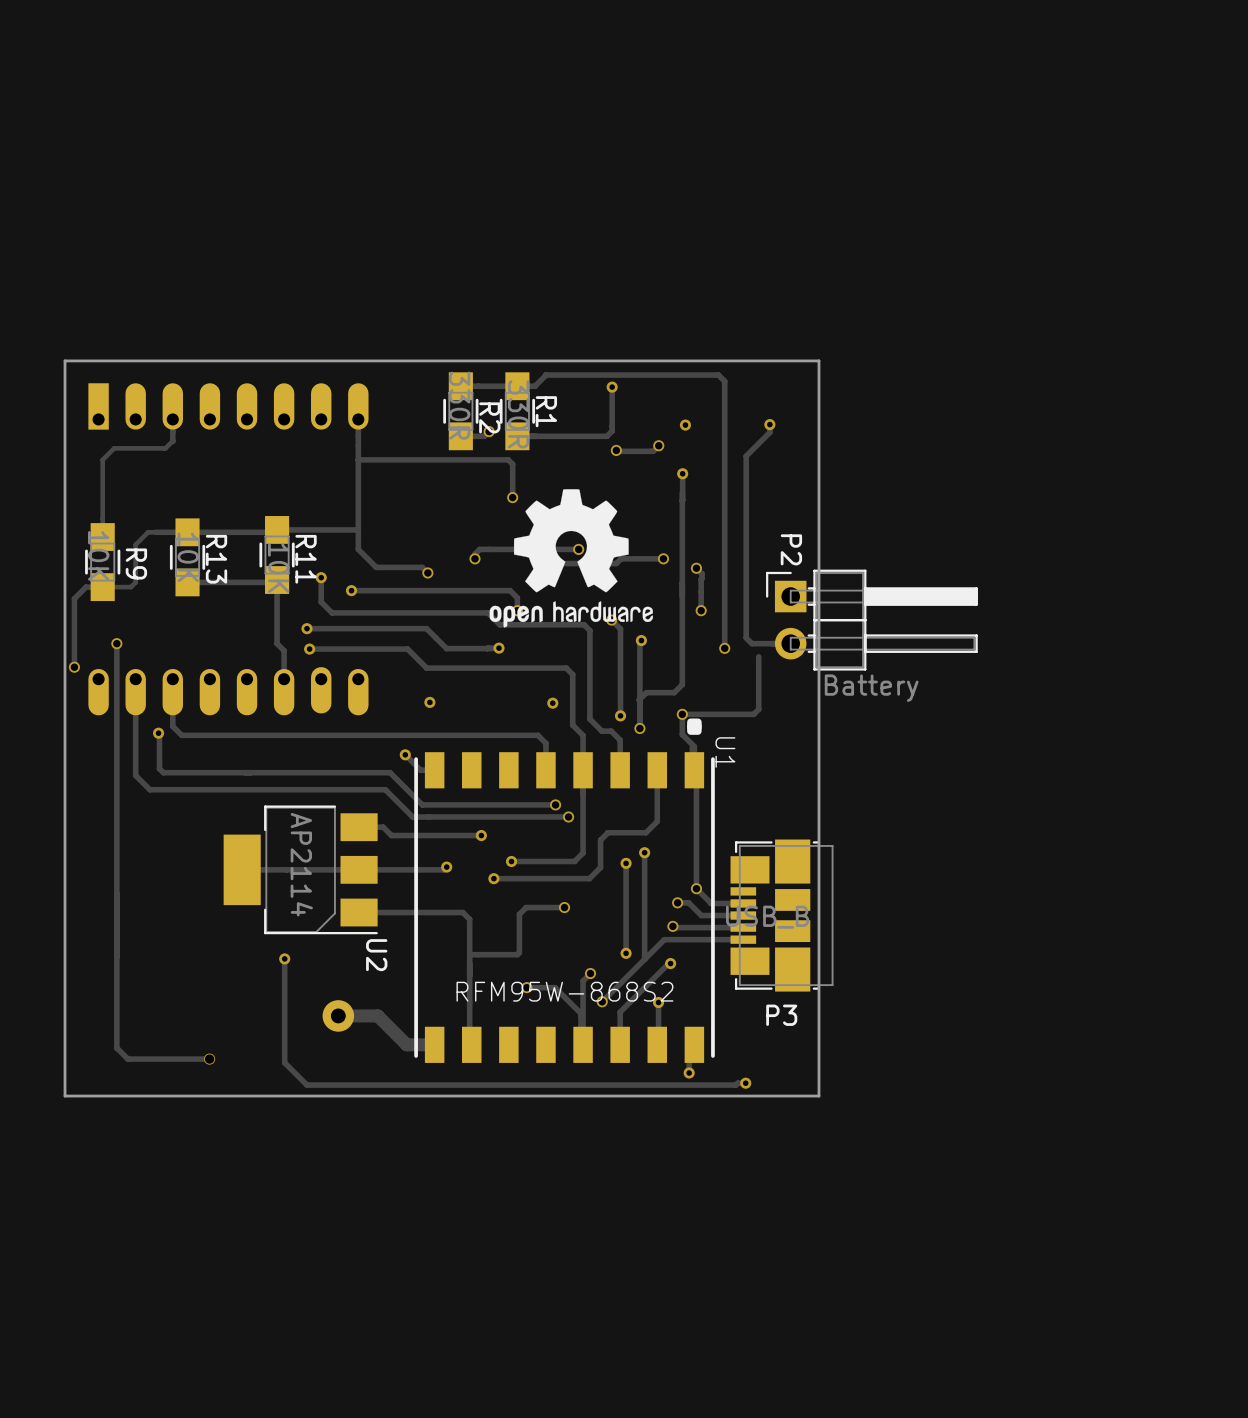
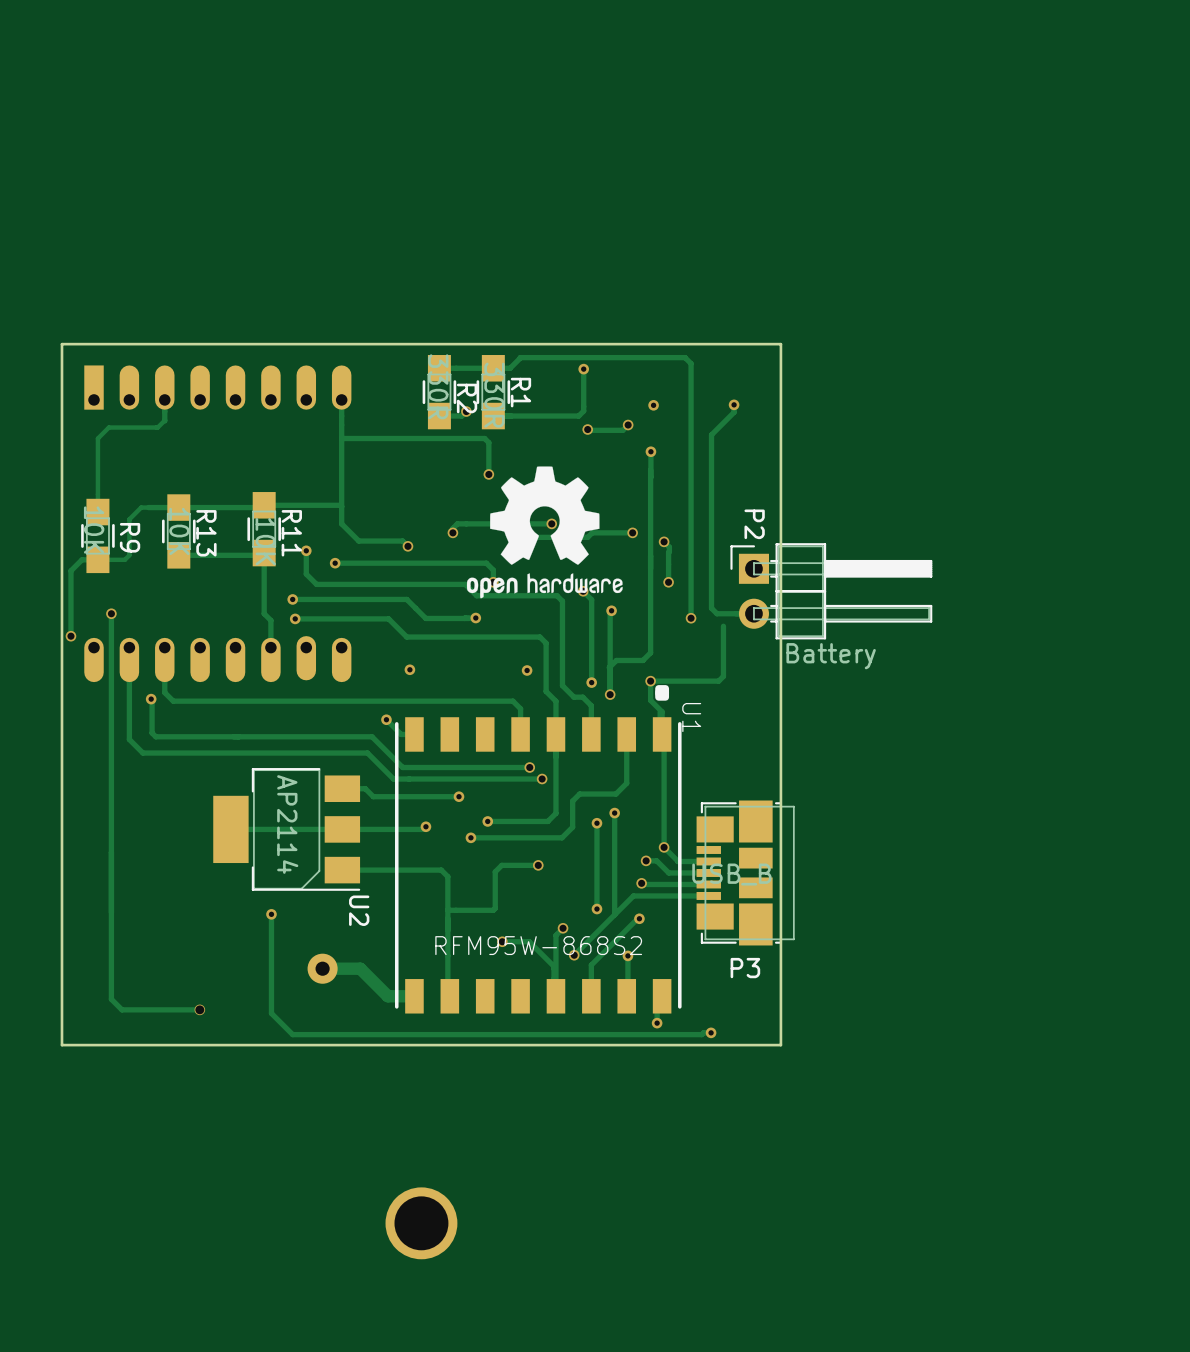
part: none -> (421, 1223)

